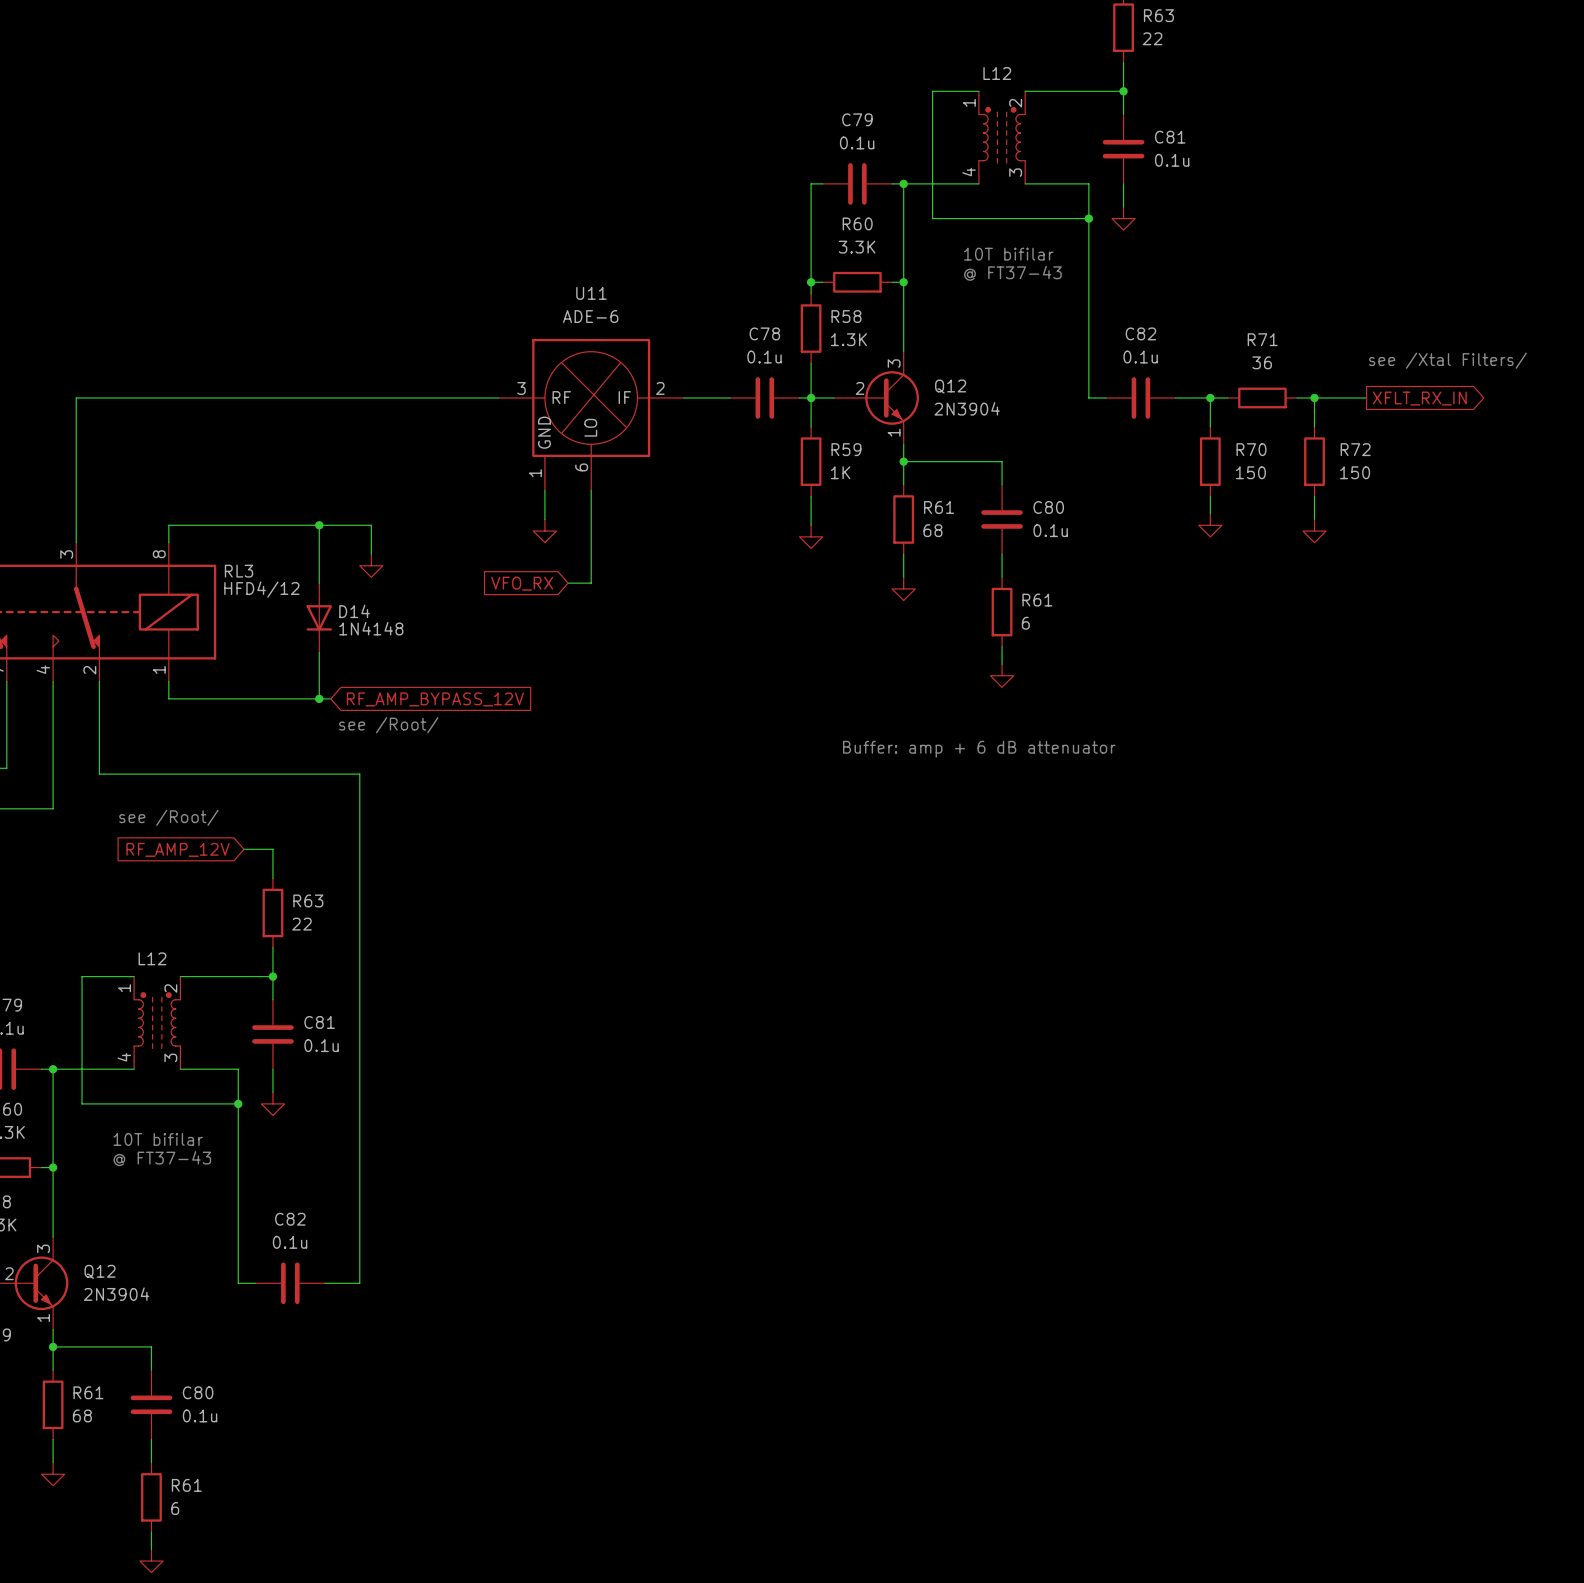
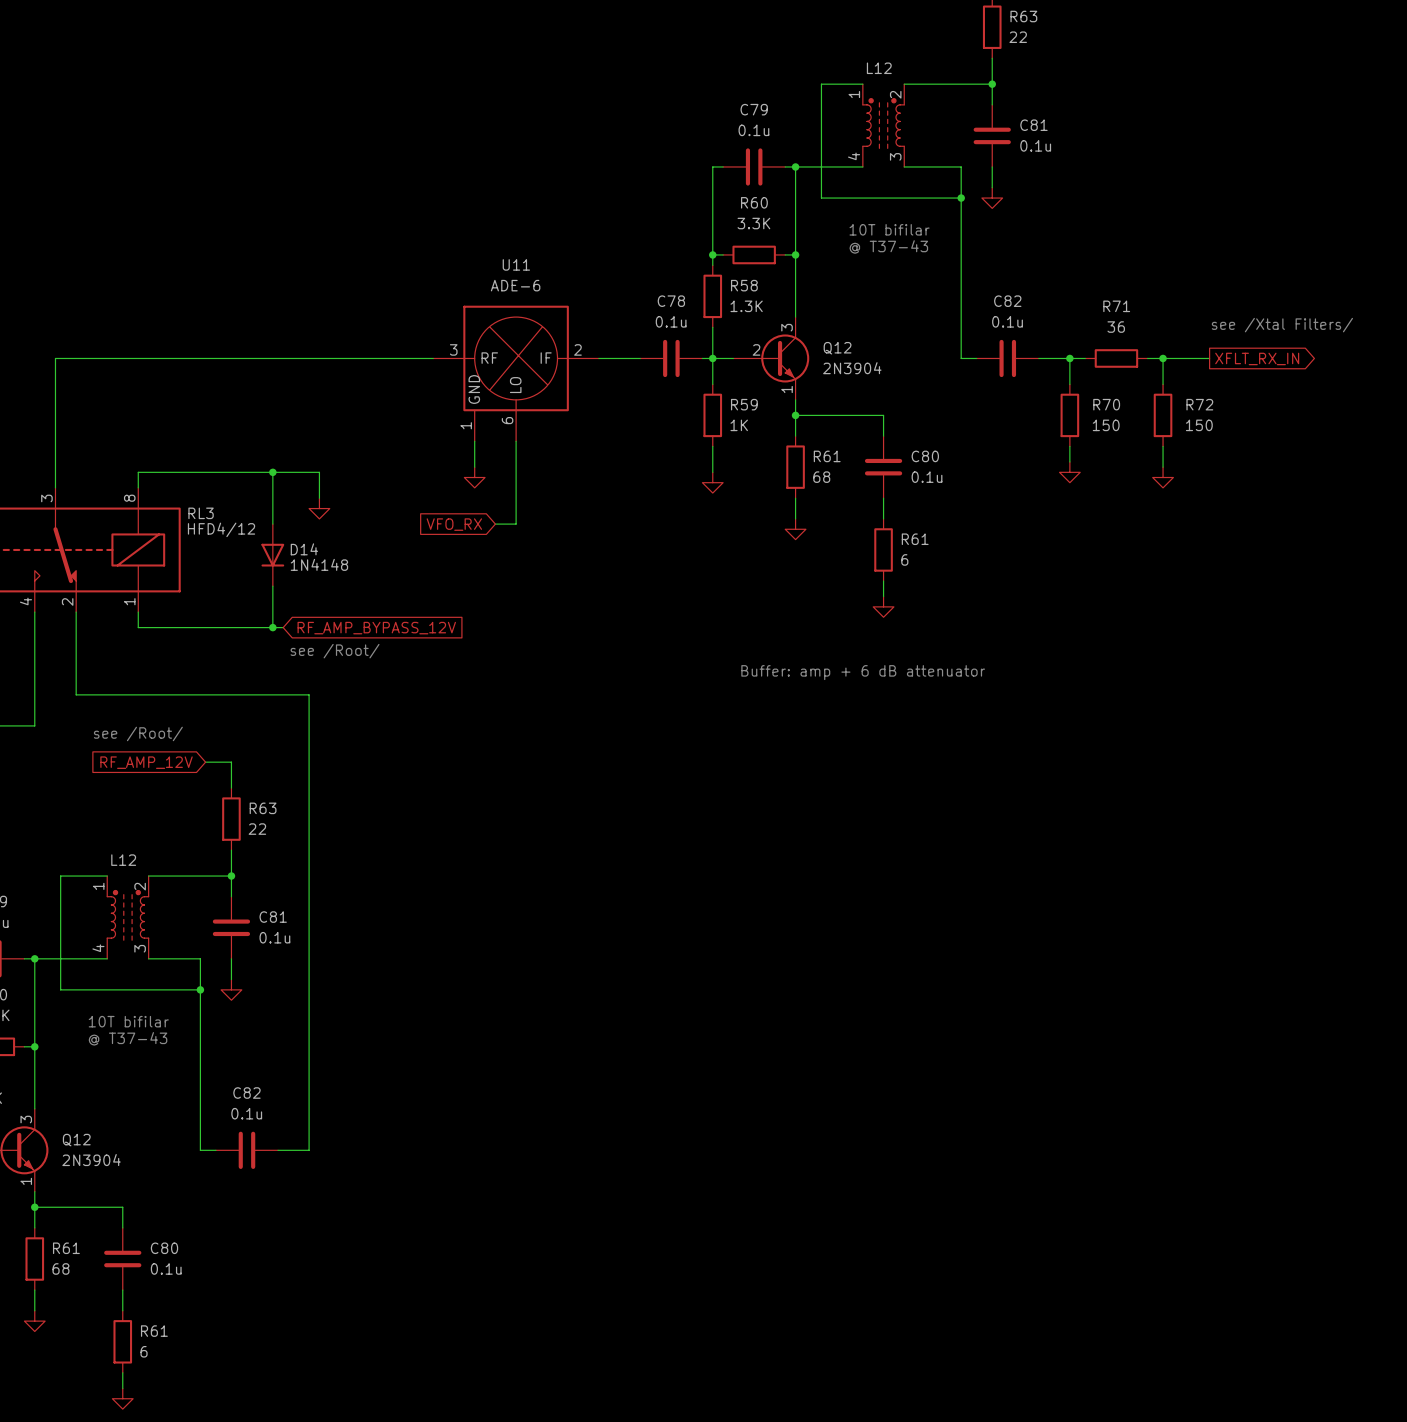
text: @ FT37-43 (1012, 273) -> @ T37-43 (888, 246)
text: @ FT37-43 (162, 1158) -> @ T37-43 (128, 1038)

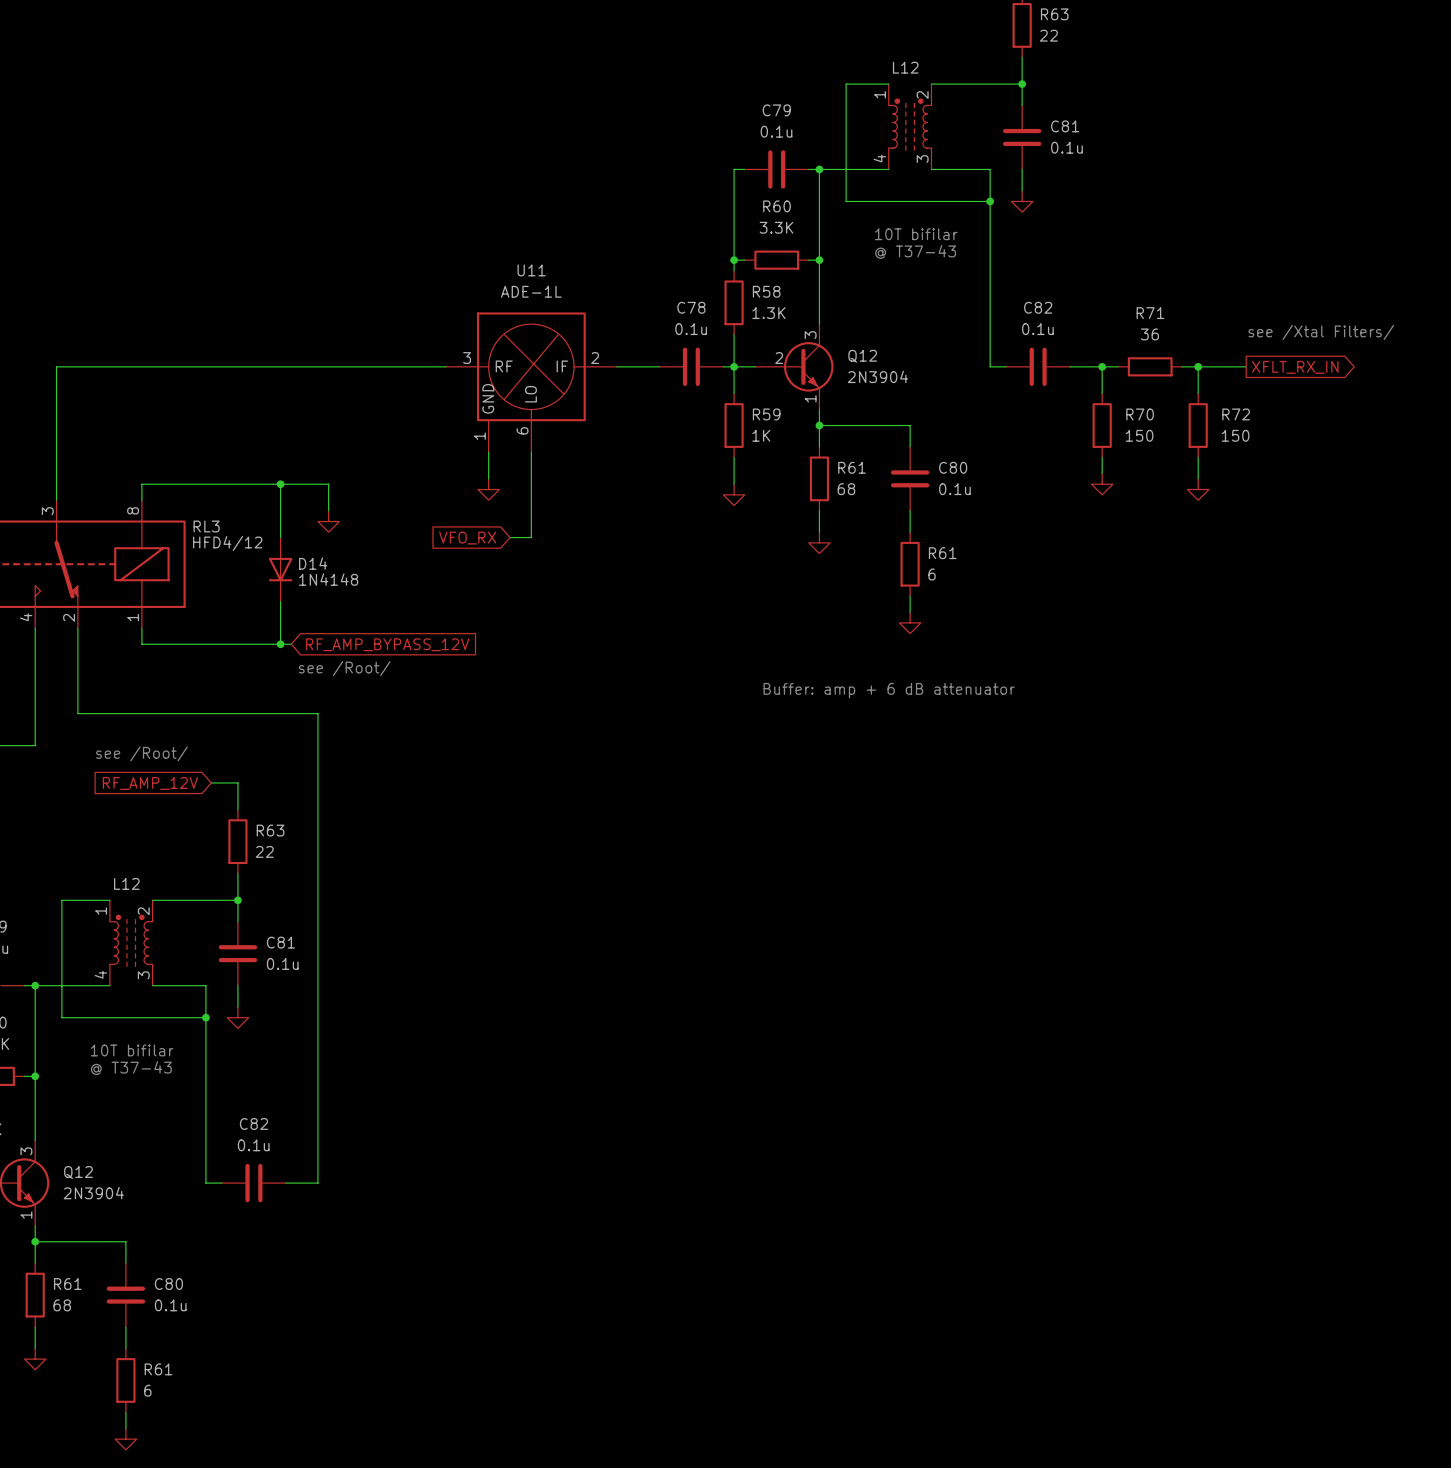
U11 value: ADE-6 (515, 285) -> ADE-1L (531, 291)

